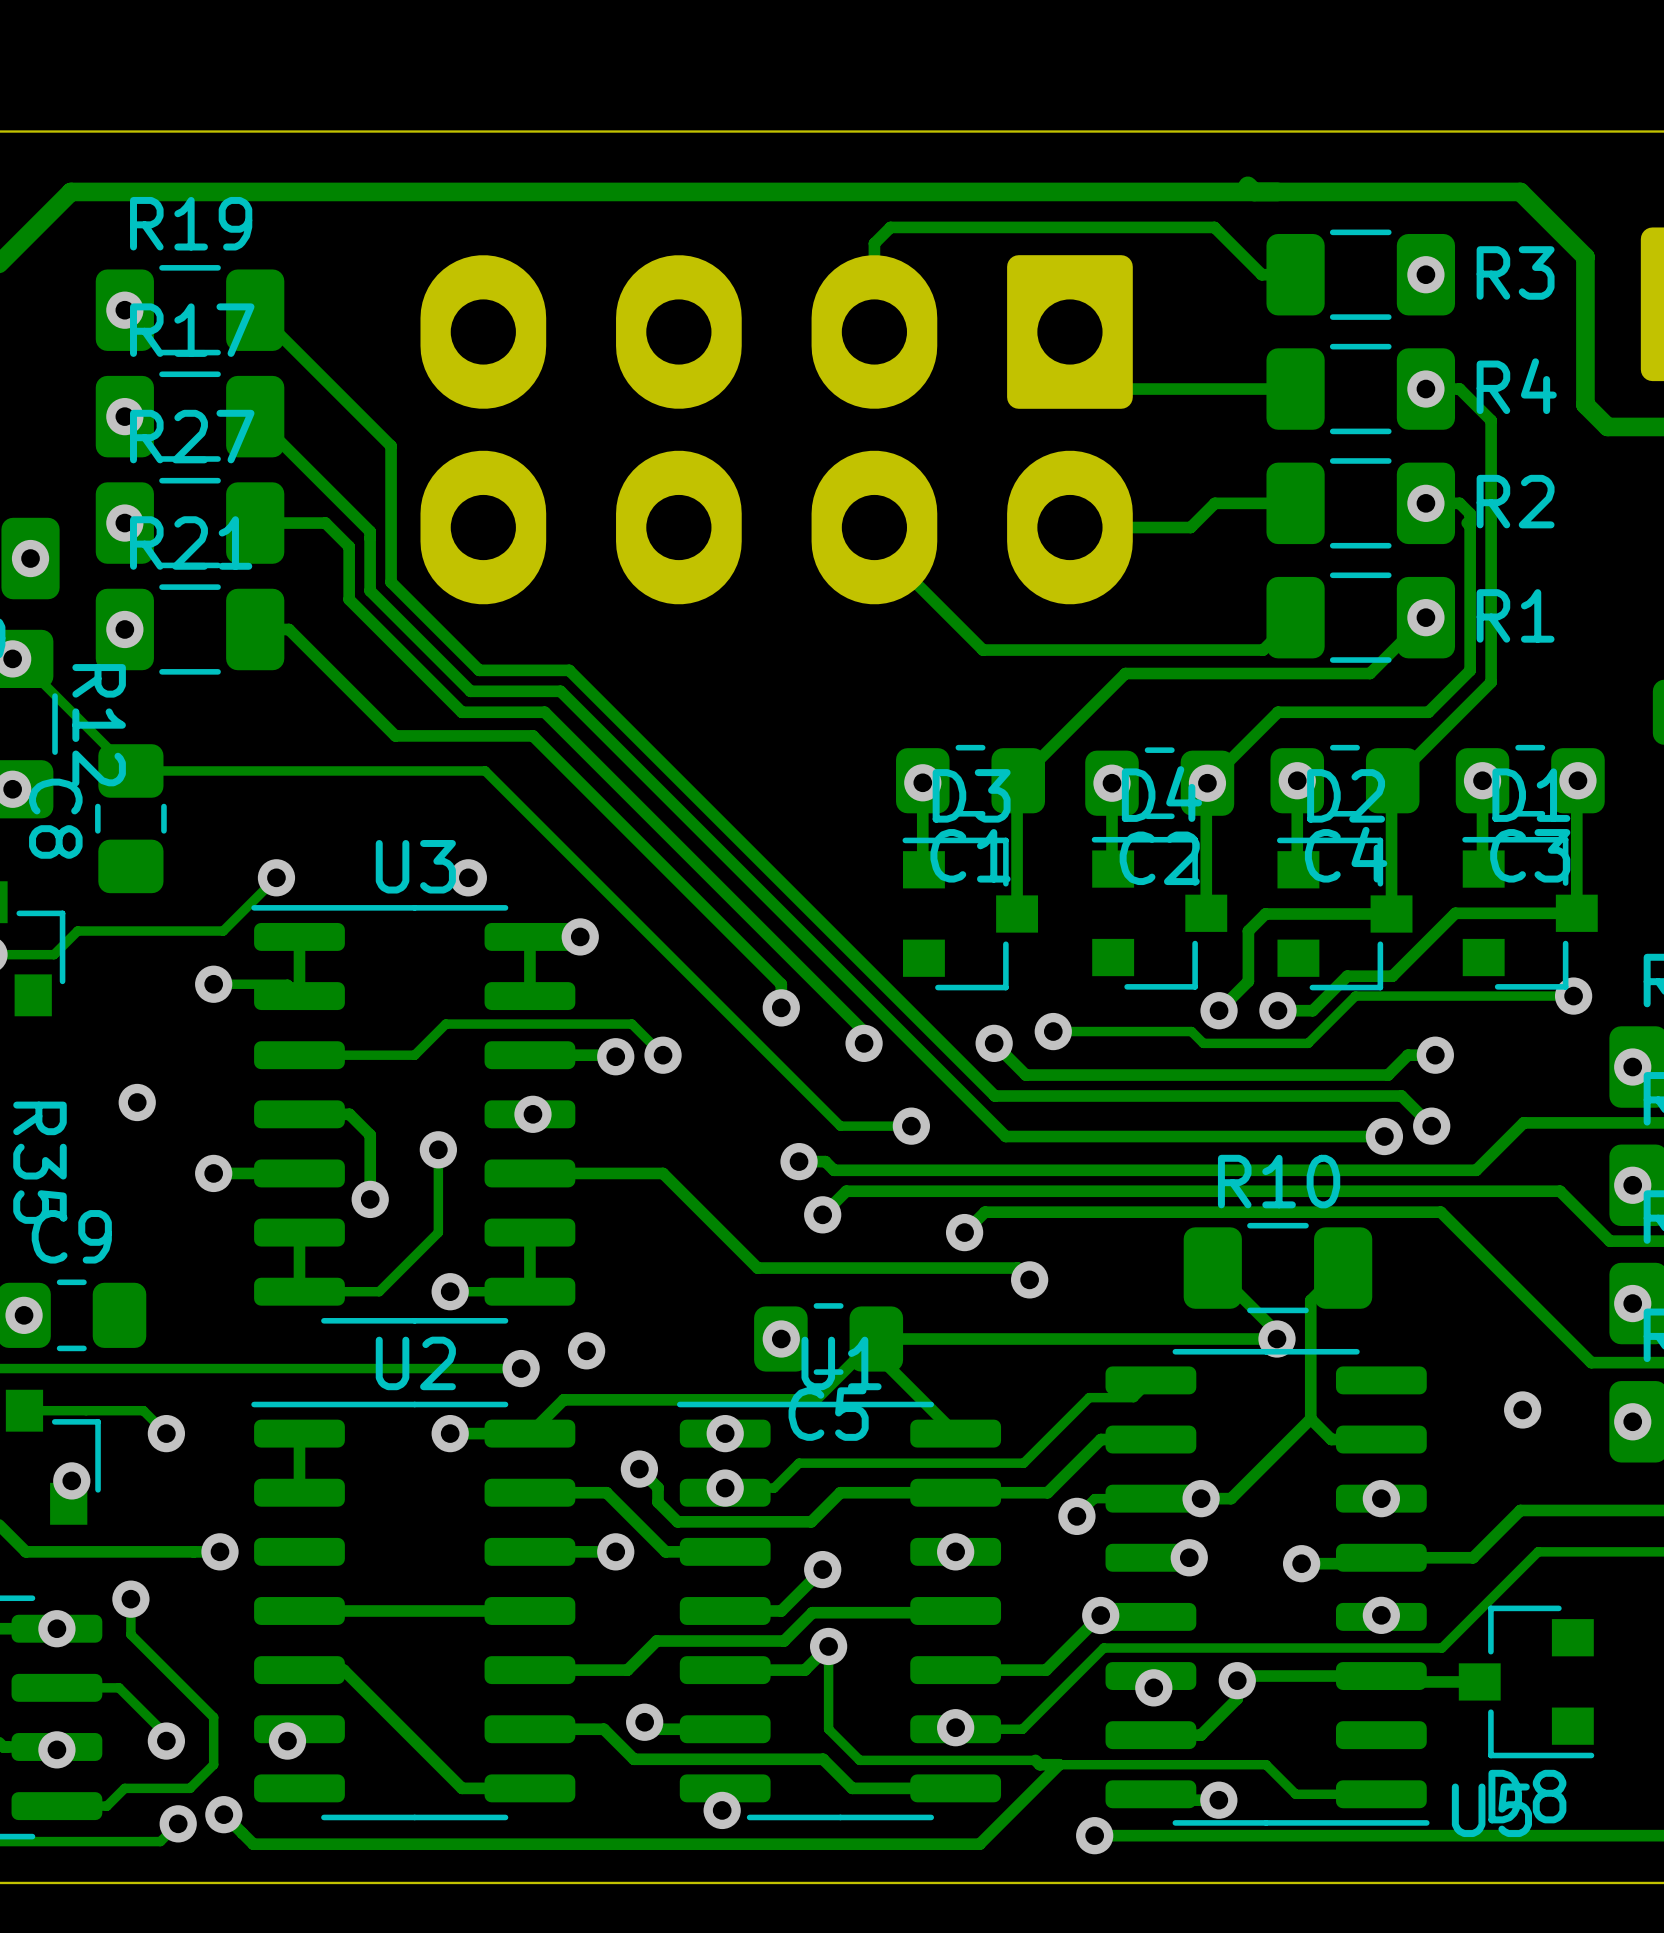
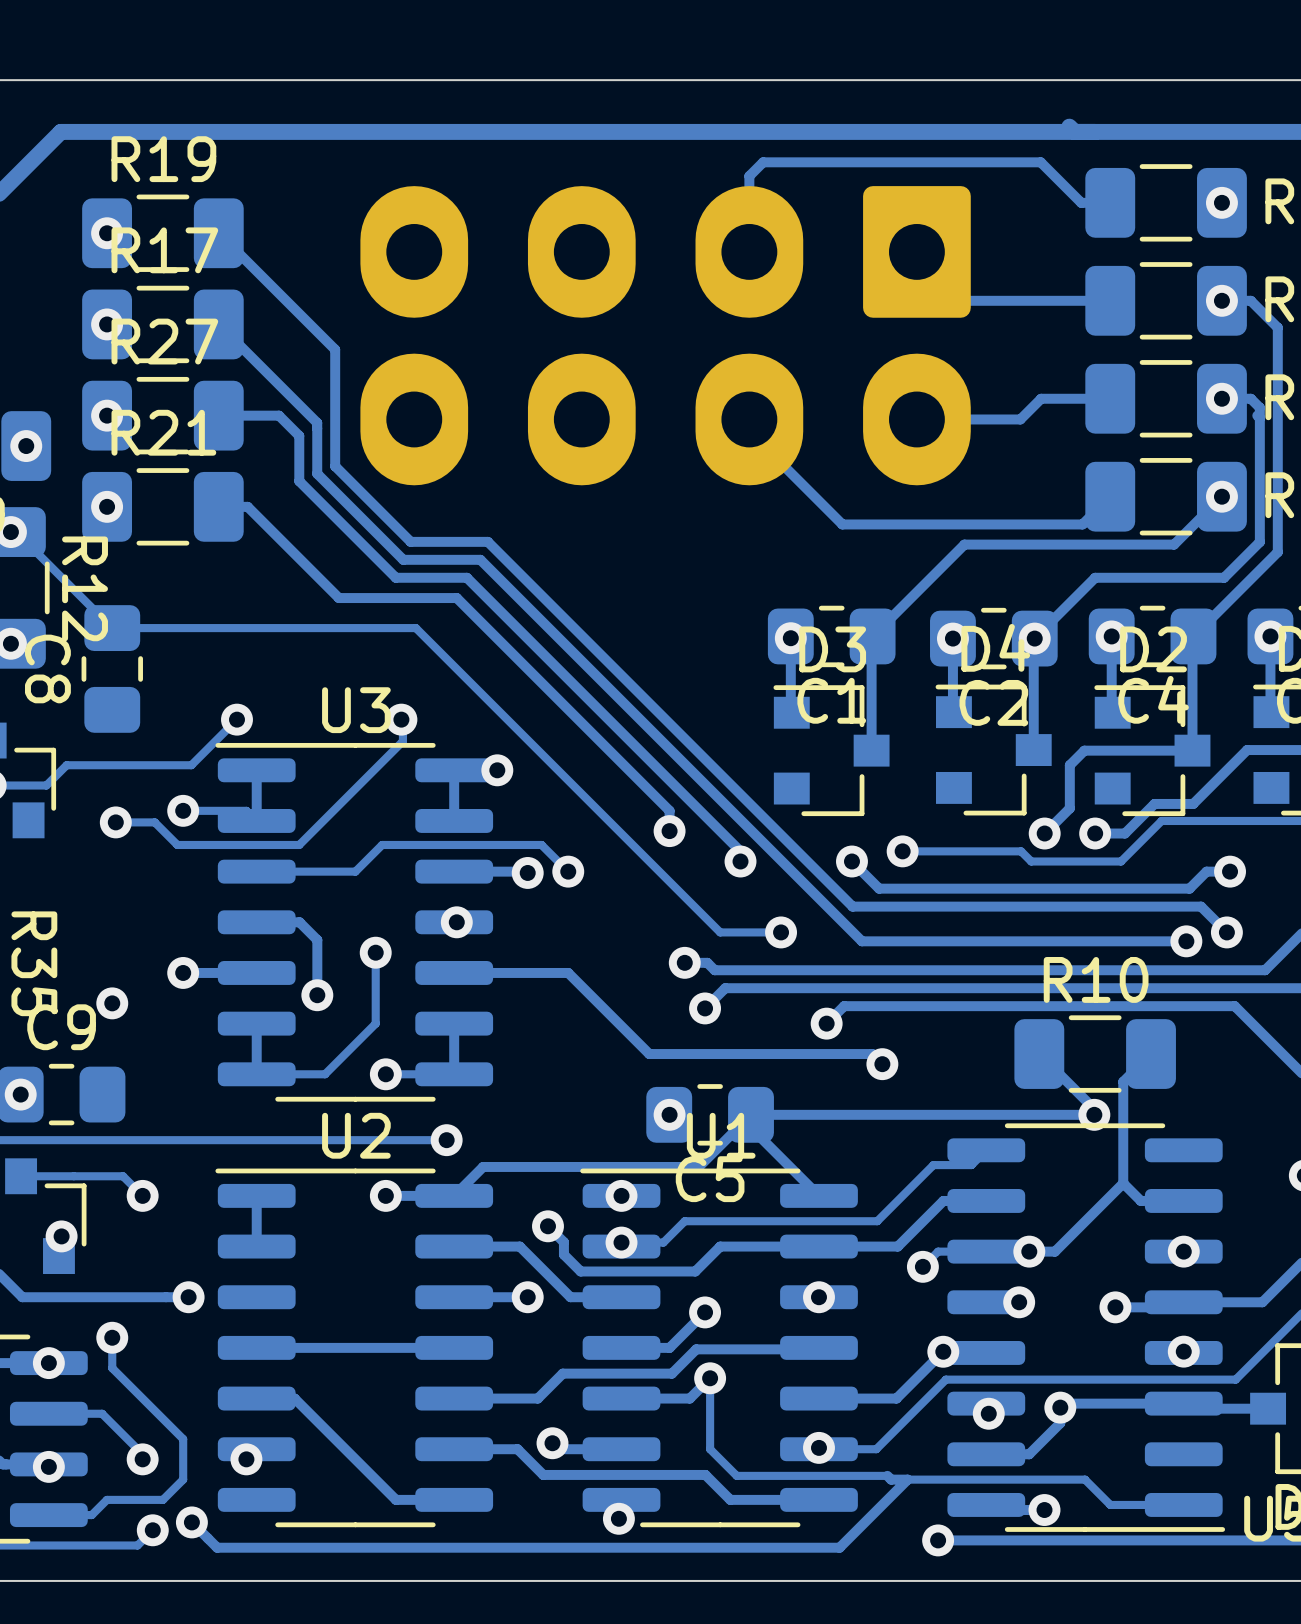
track: none -> (402, 718) (402, 741) (299, 844) (177, 844) (154, 822) (115, 822)
via: none -> (115, 822)
via: (137, 1102) -> none
via: none -> (112, 1003)
via: (586, 1350) -> none

